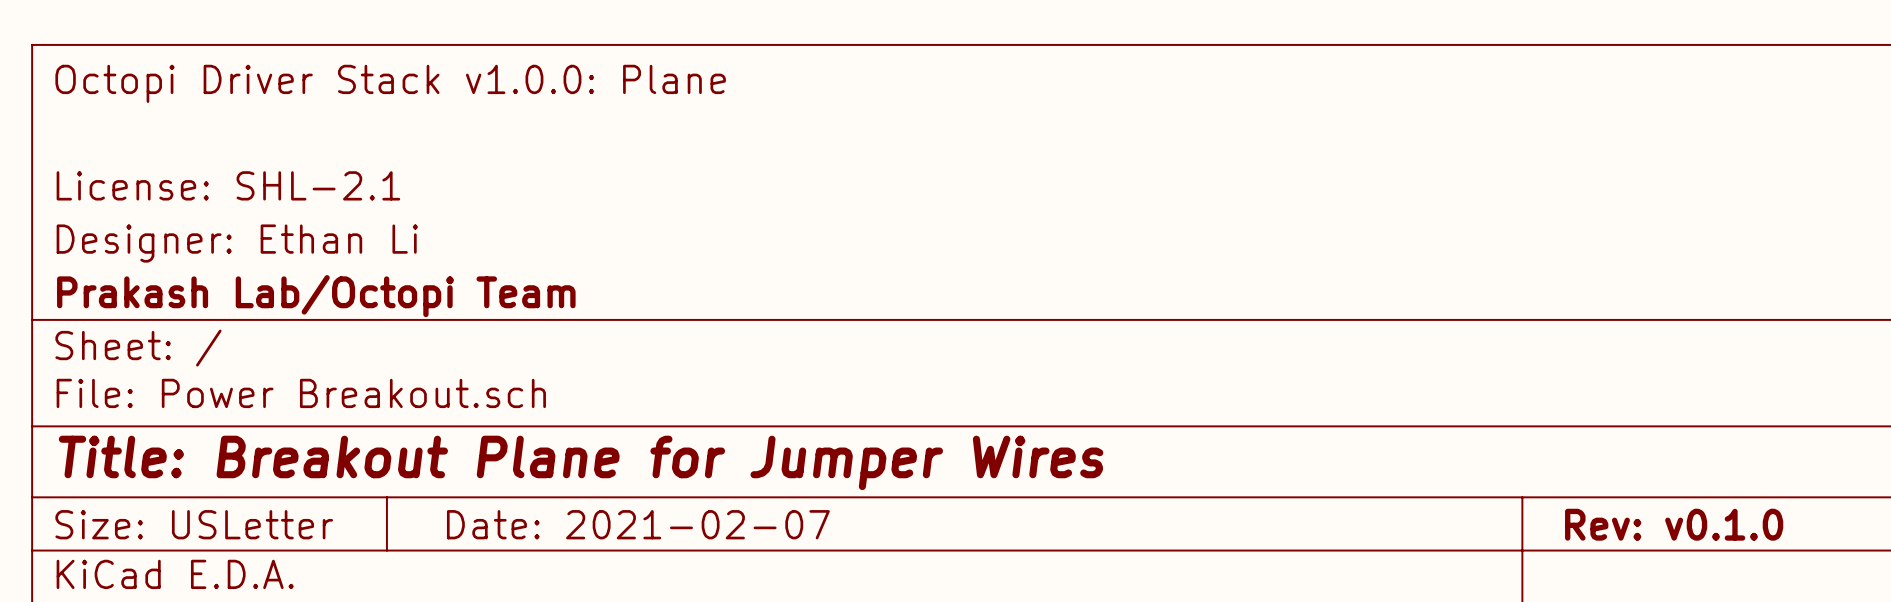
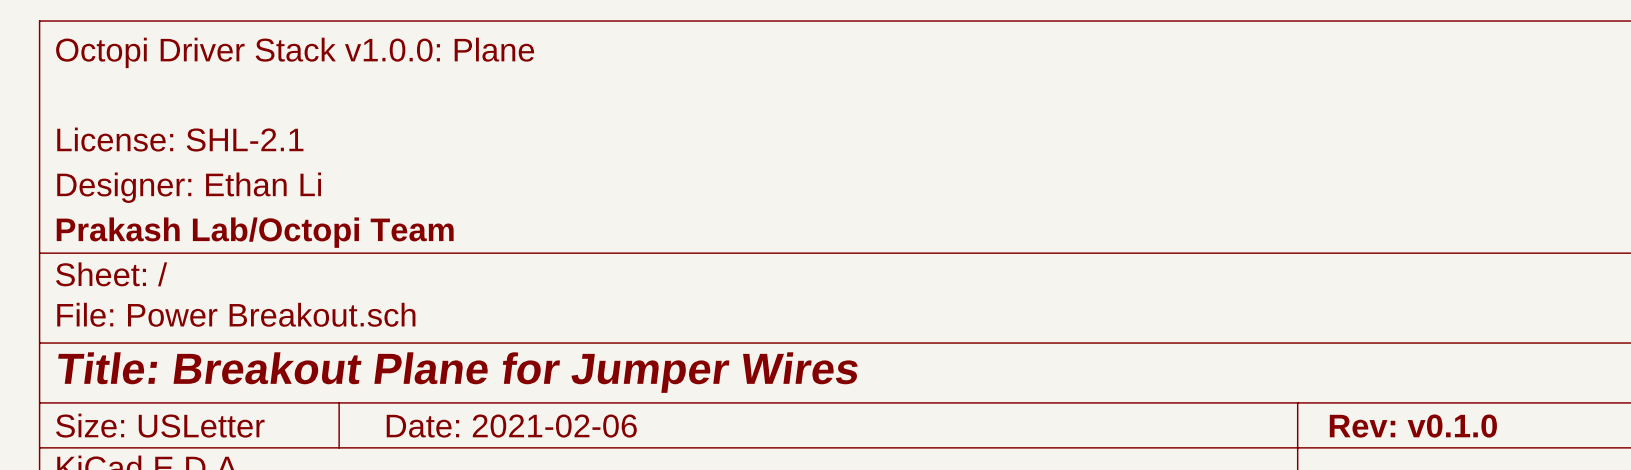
title block: Date: 2021-02-07 (638, 524) -> Date: 2021-02-06 (511, 426)

